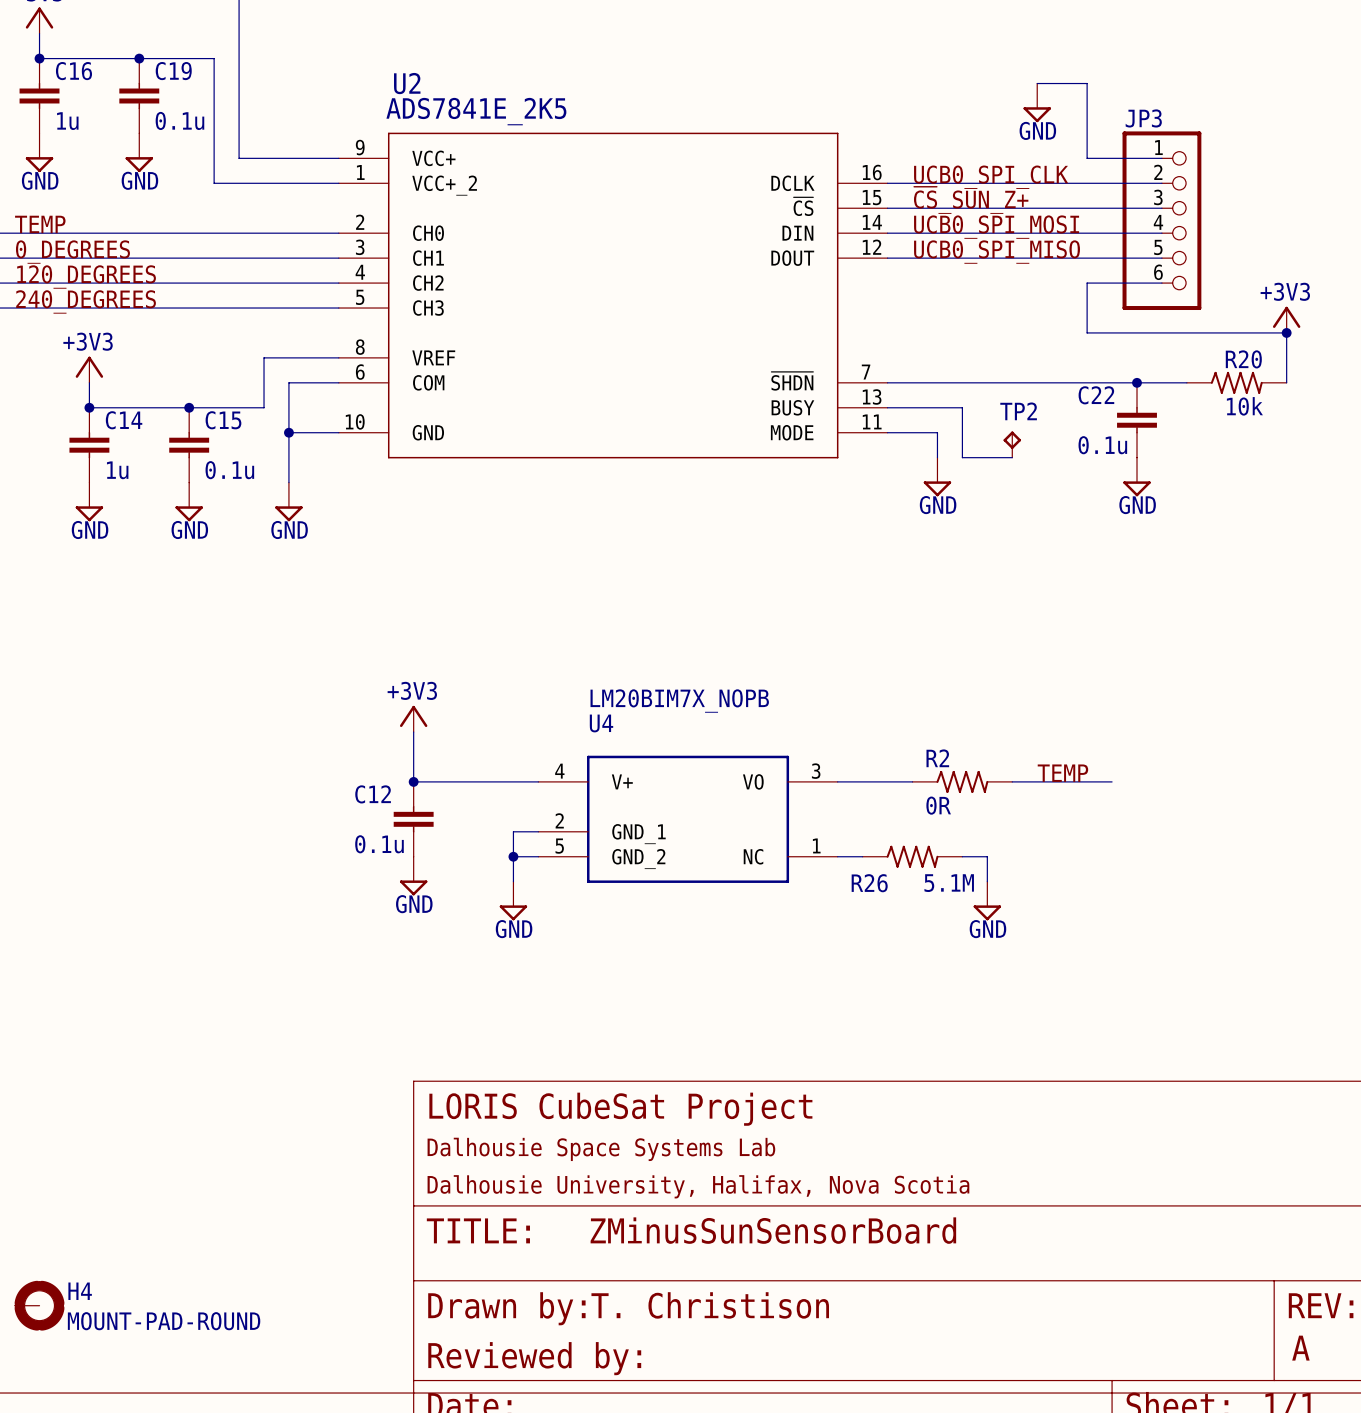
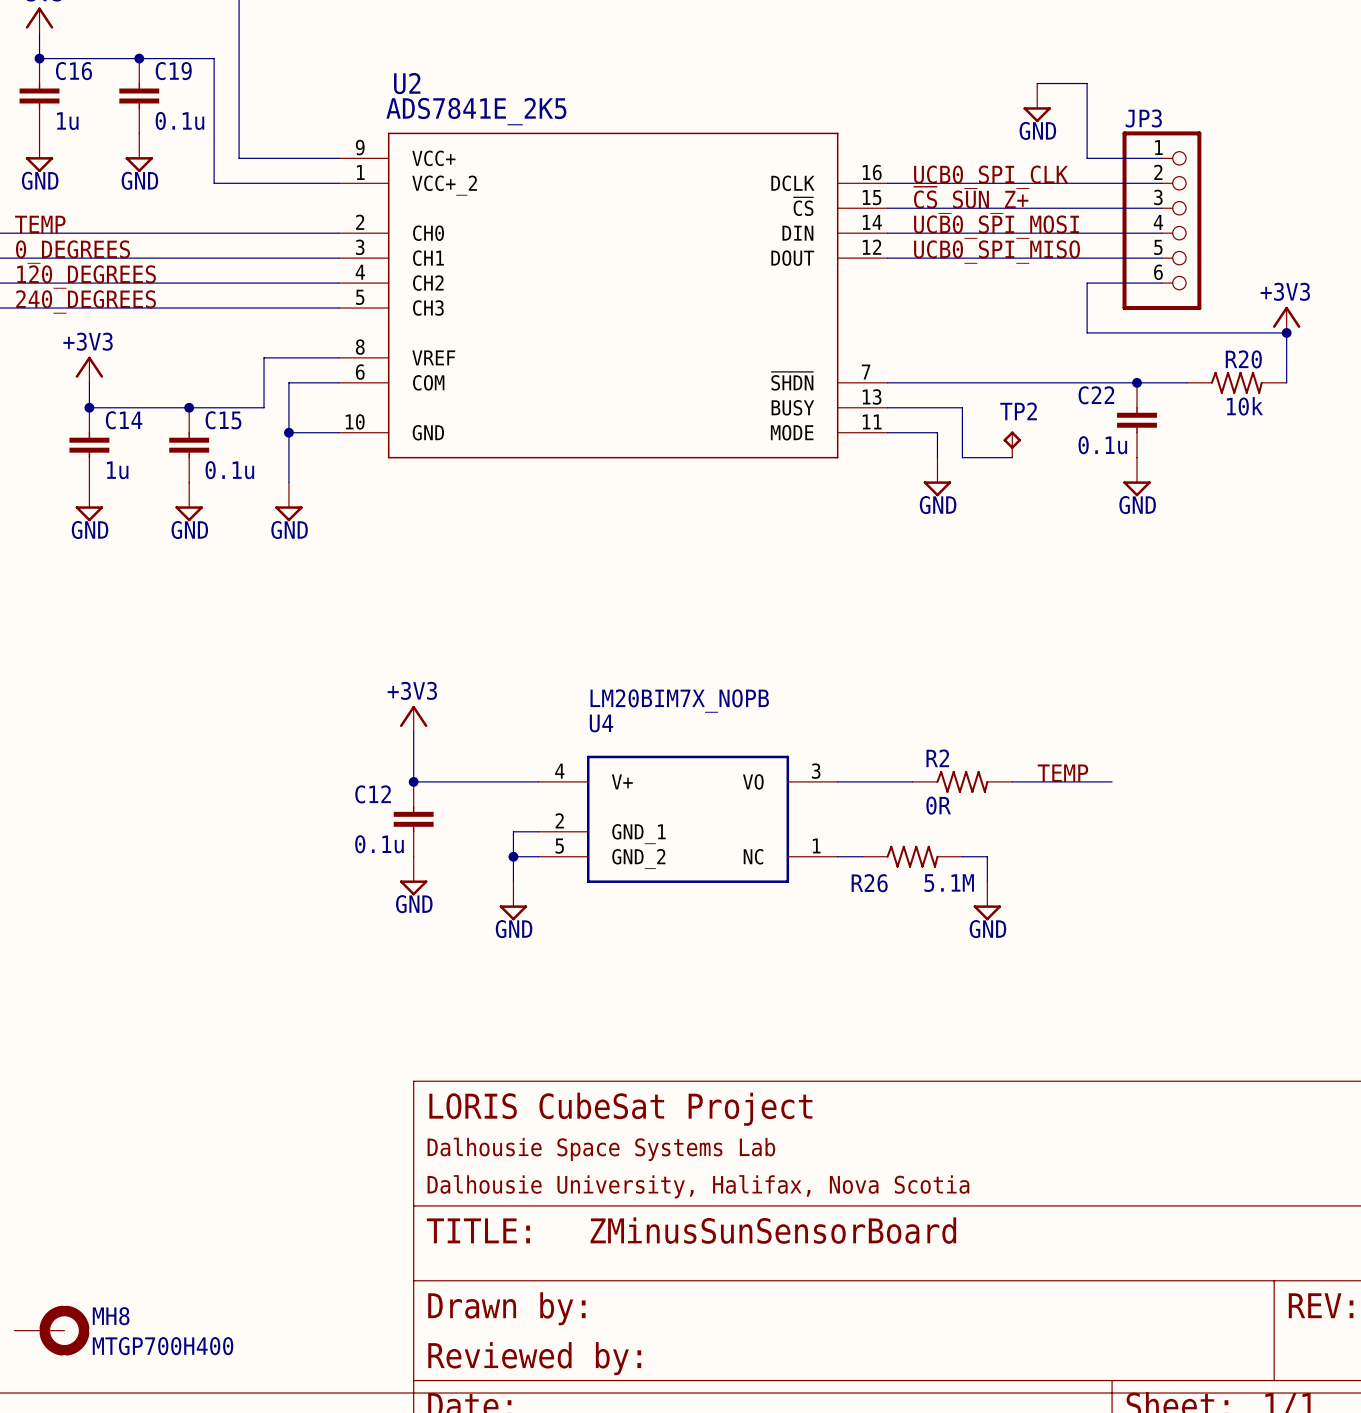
H4: MOUNT-PAD-ROUND (39, 1305) -> none
text: T. Christison (710, 1305) -> none
MH8: none -> MTGP700H400 (51, 1330)
text: A (1300, 1348) -> none

